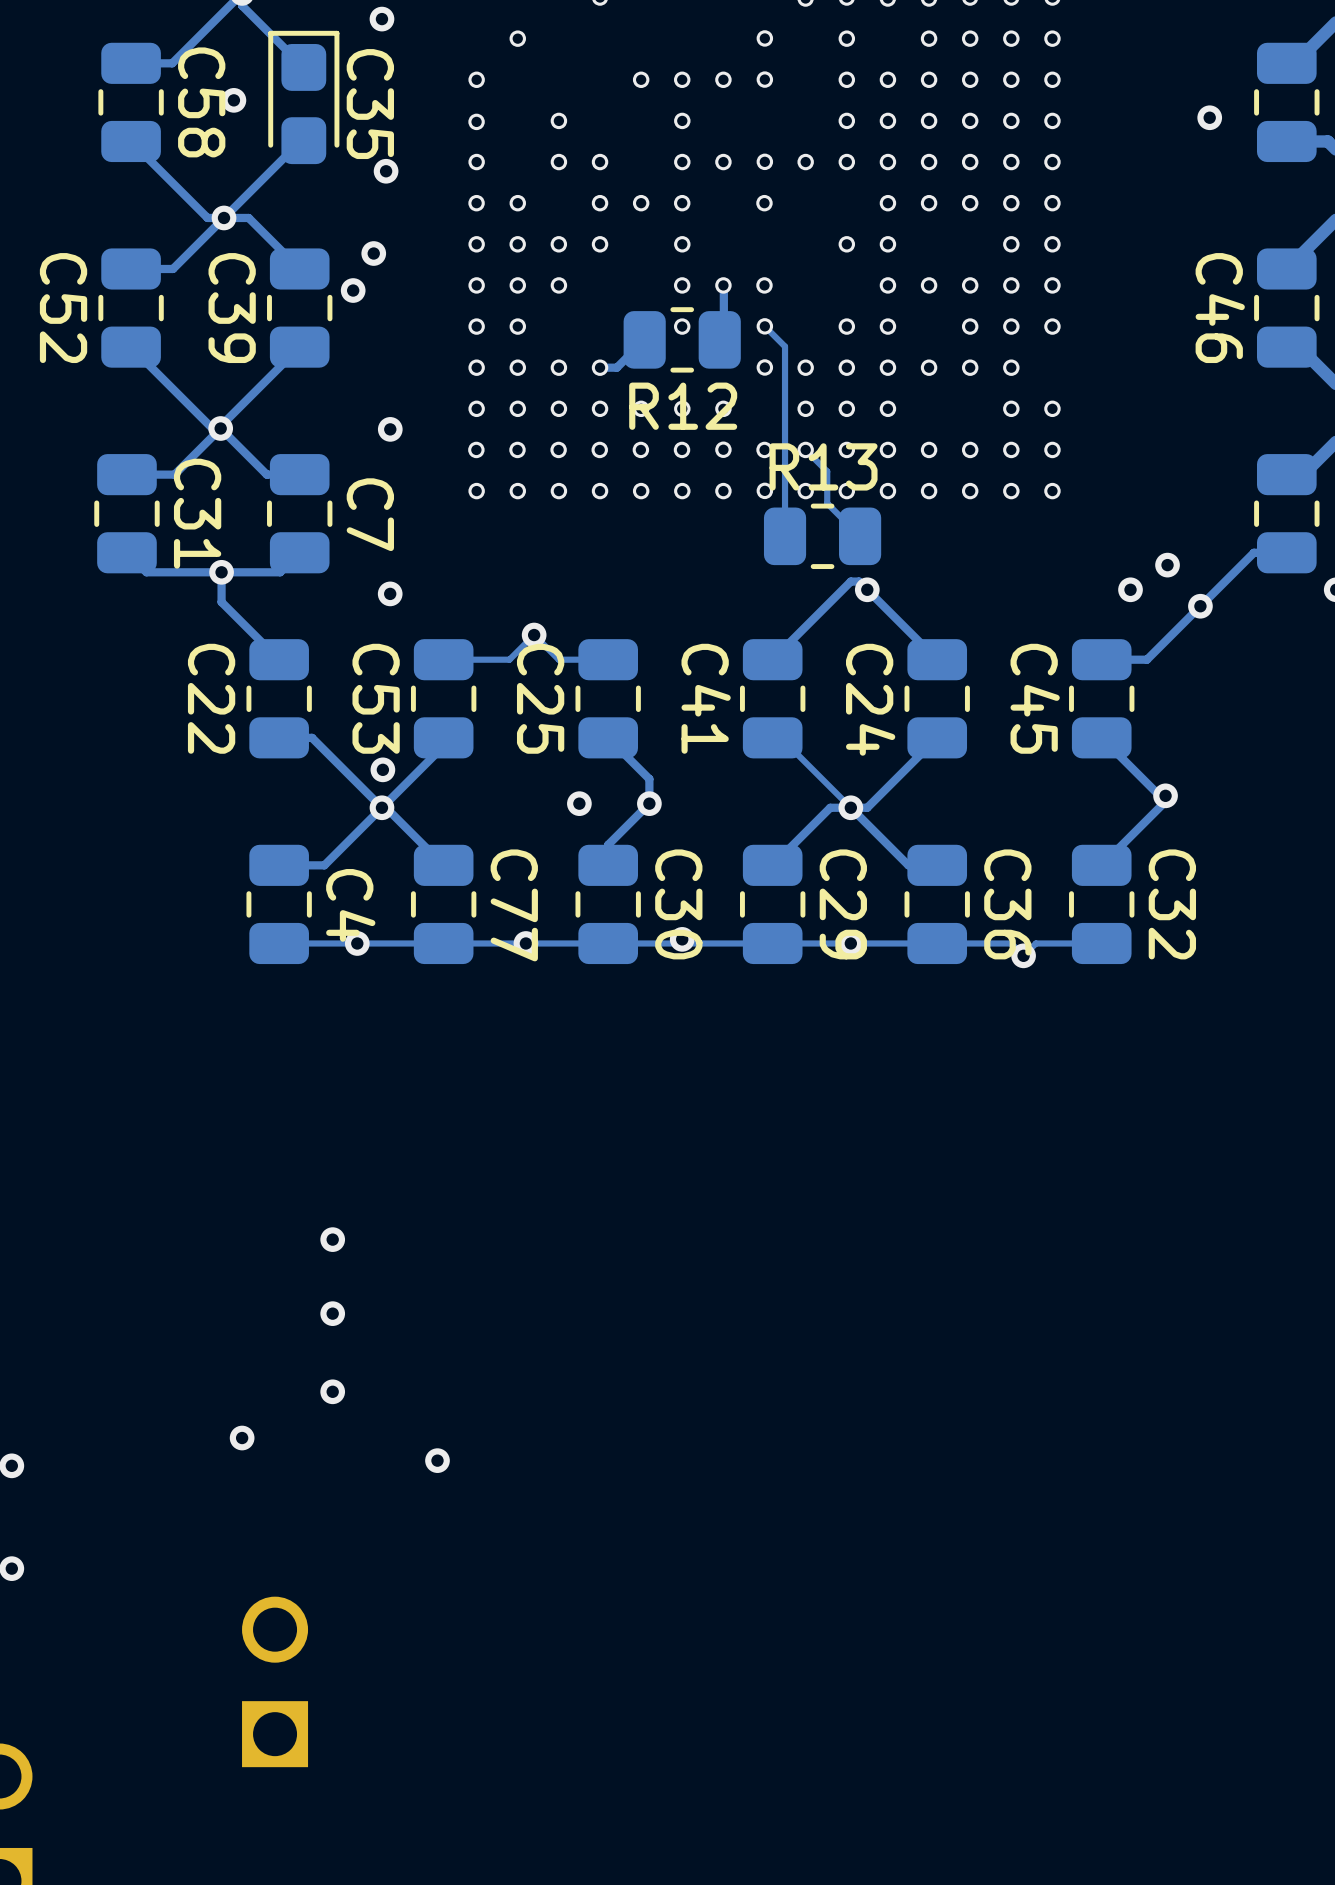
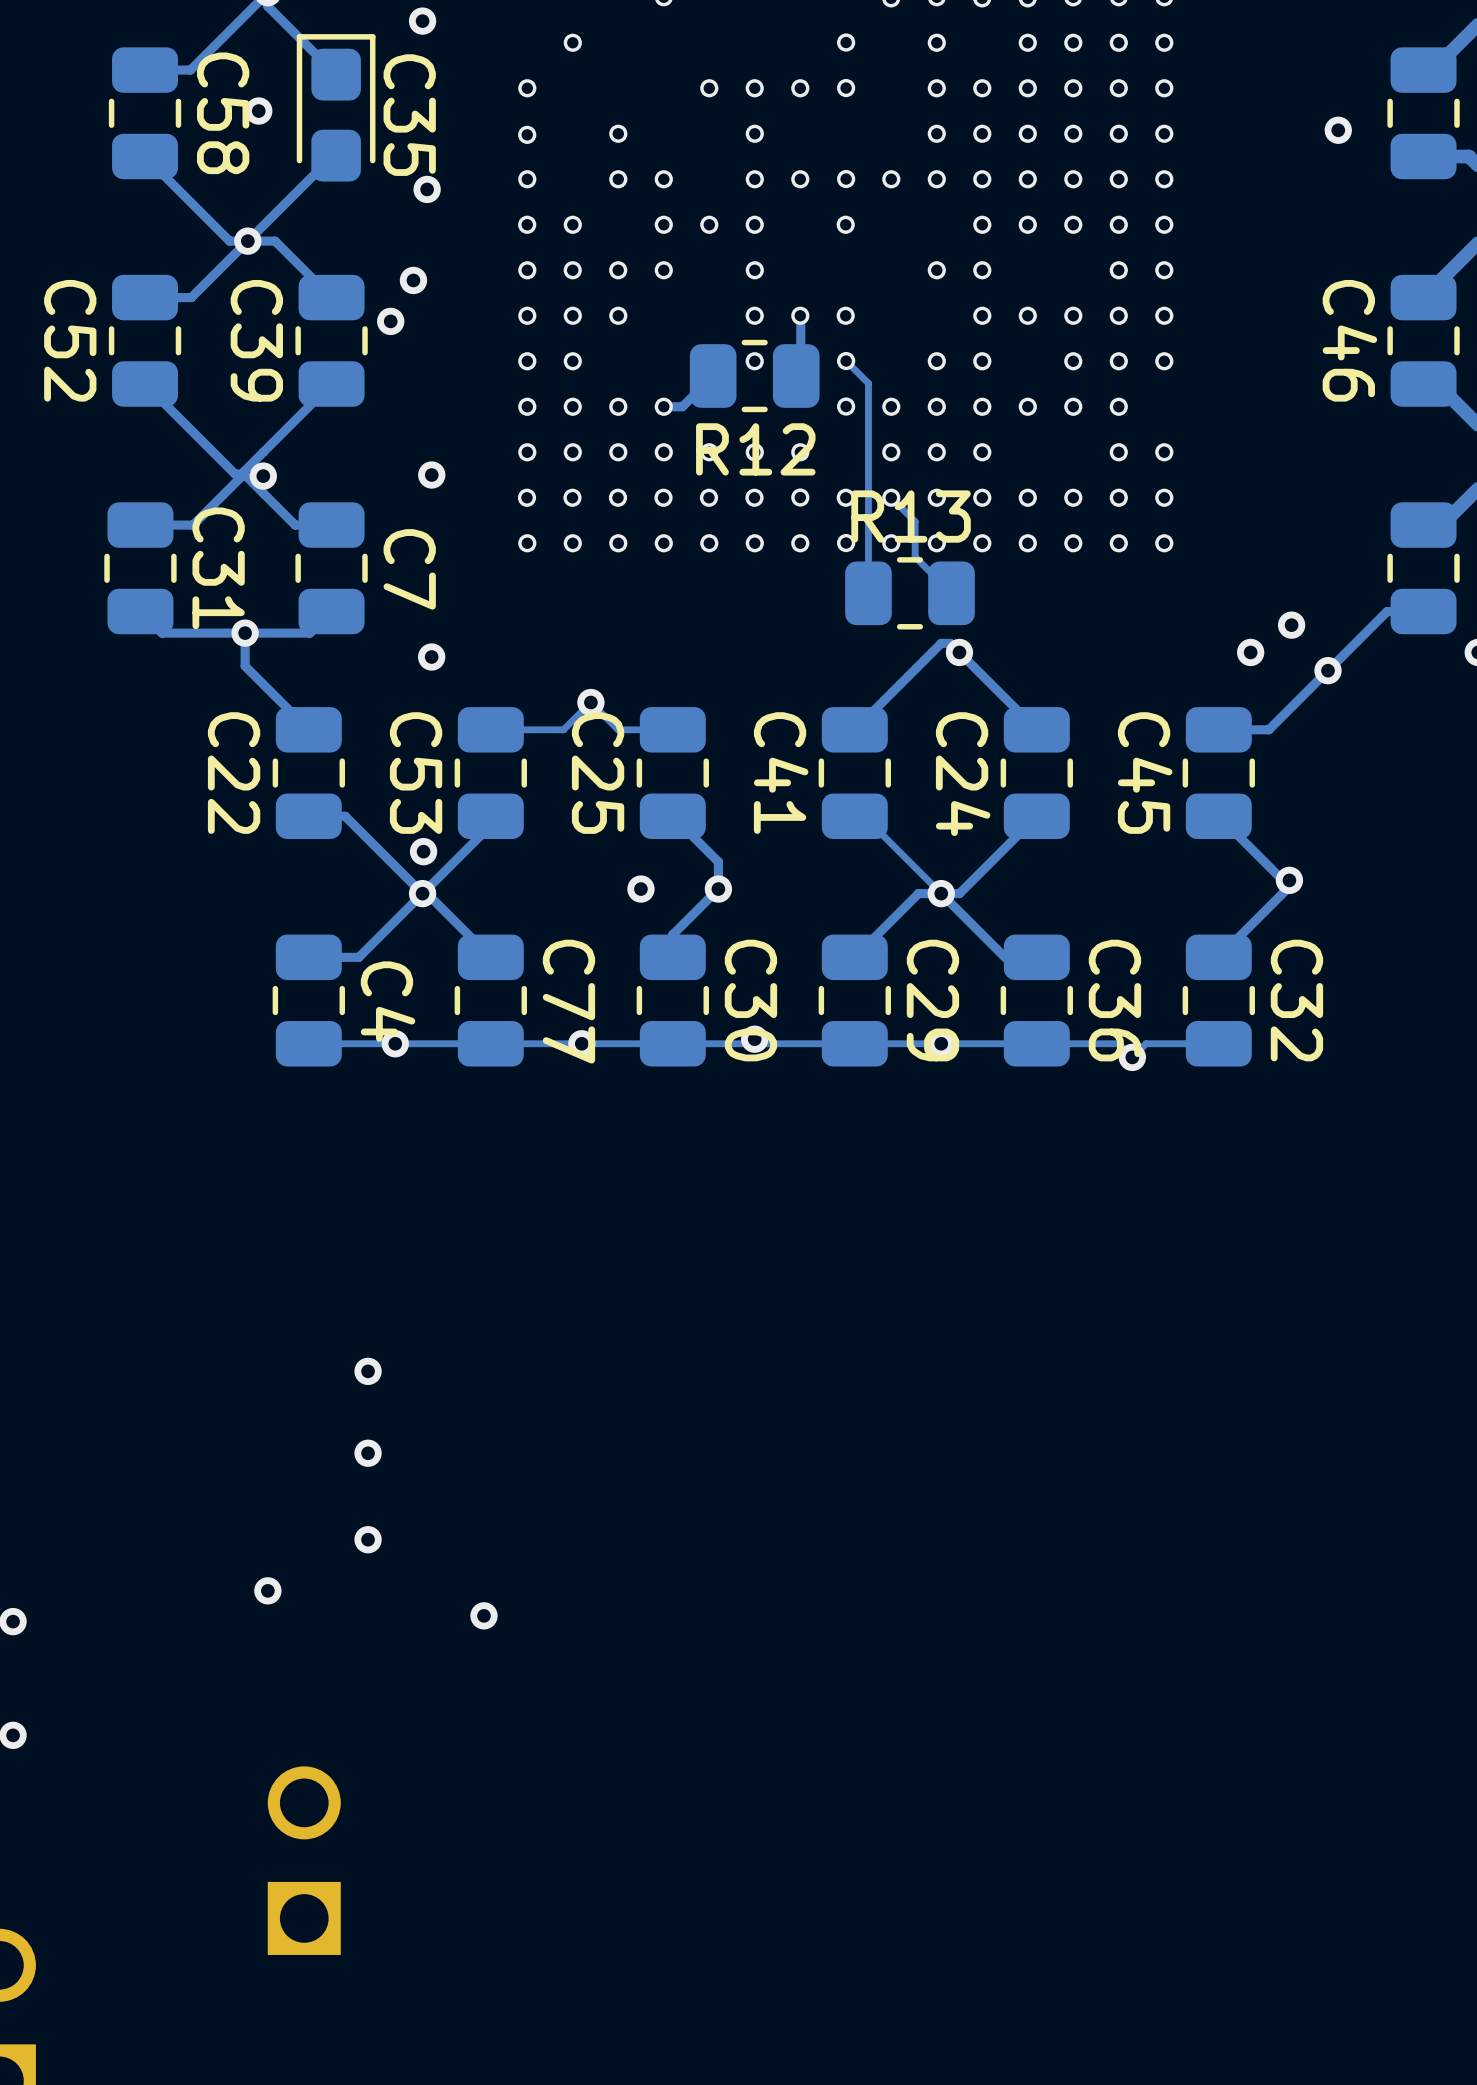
via position: (220, 428) -> (263, 476)

